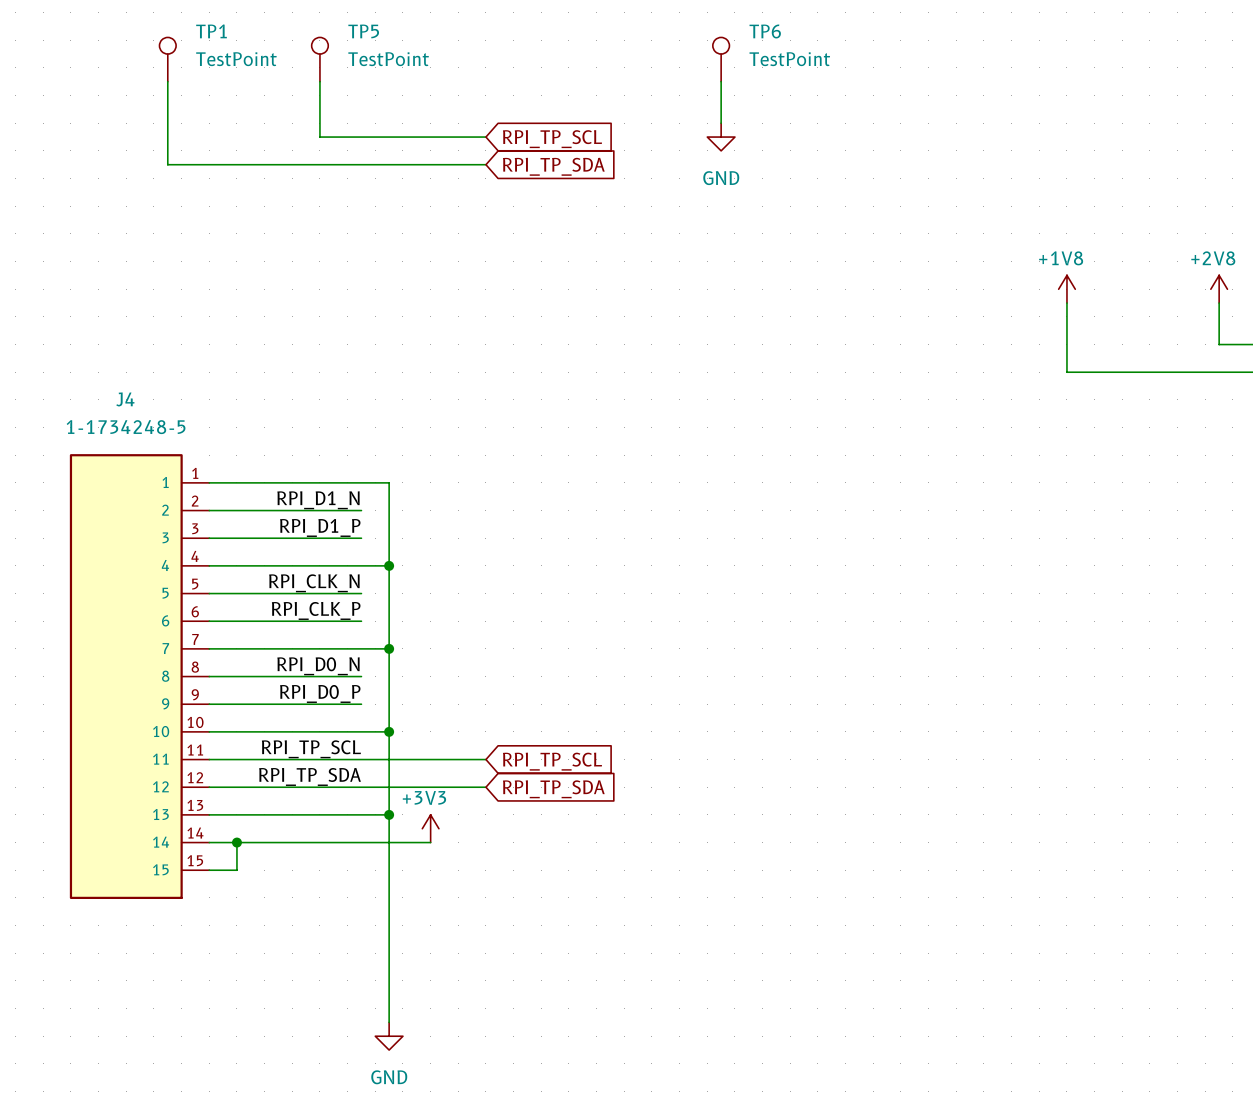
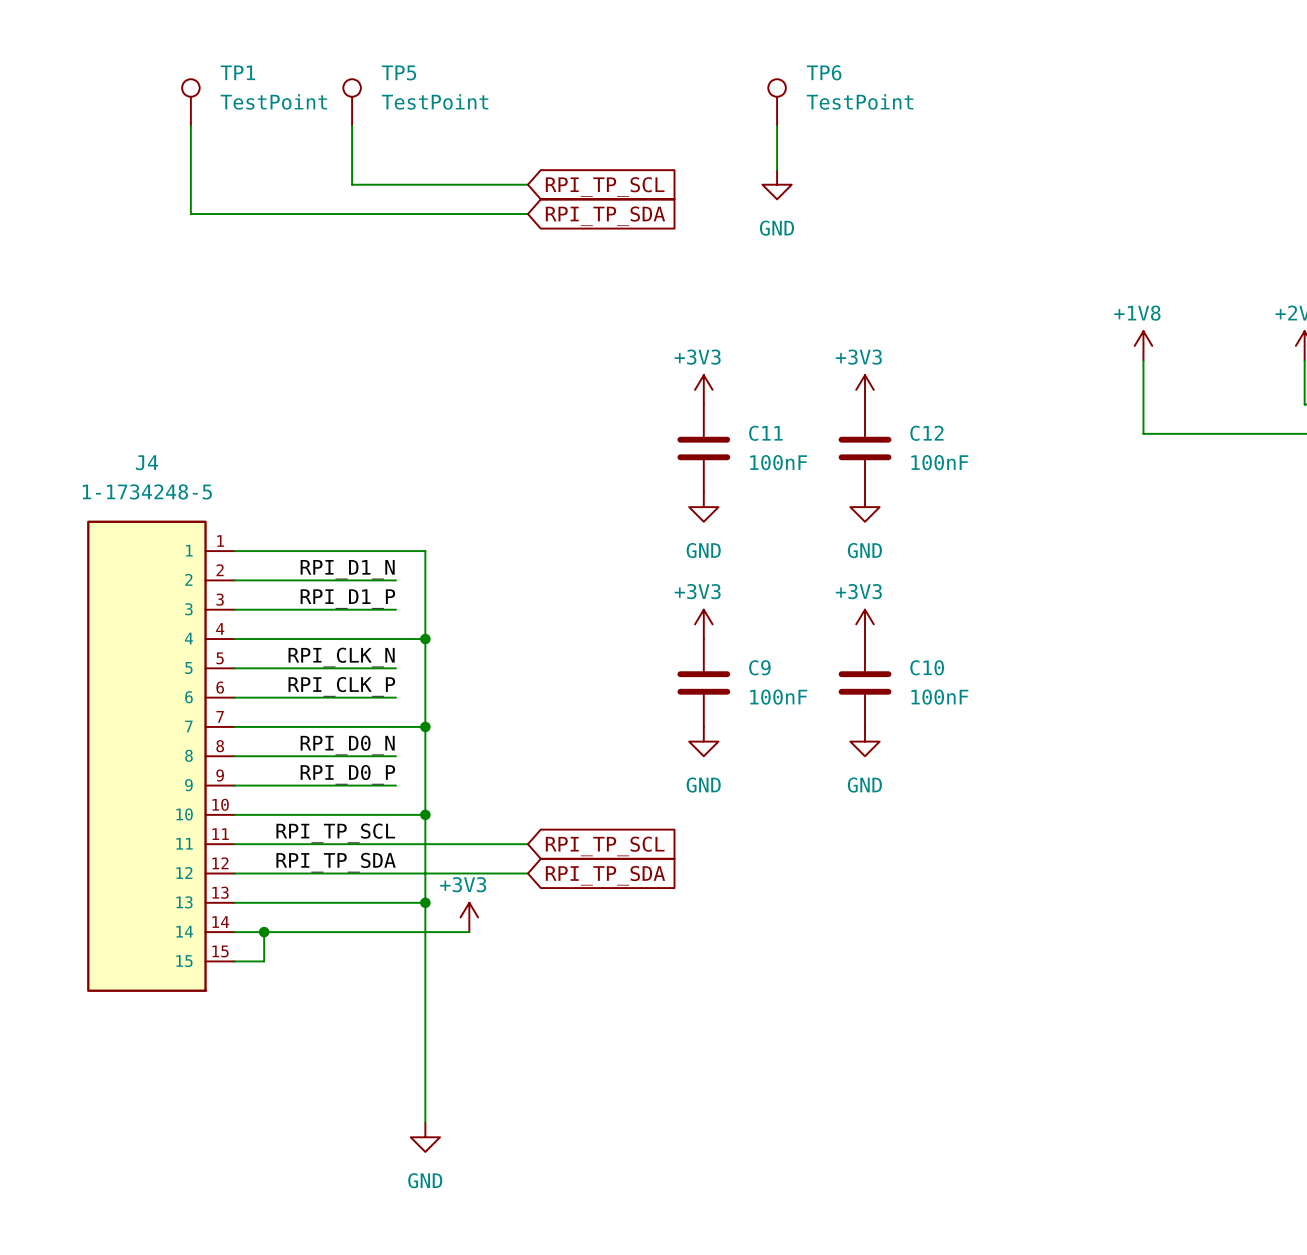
power symbol: none -> +3V3 (703, 389)
power symbol: none -> +3V3 (865, 389)
C11: none -> 100nF (703, 448)
C12: none -> 100nF (865, 448)
power symbol: none -> GND (703, 507)
power symbol: none -> GND (865, 507)
power symbol: none -> +3V3 (703, 624)
power symbol: none -> +3V3 (865, 624)
C9: none -> 100nF (703, 682)
C10: none -> 100nF (865, 682)
power symbol: none -> GND (703, 741)
power symbol: none -> GND (865, 741)

